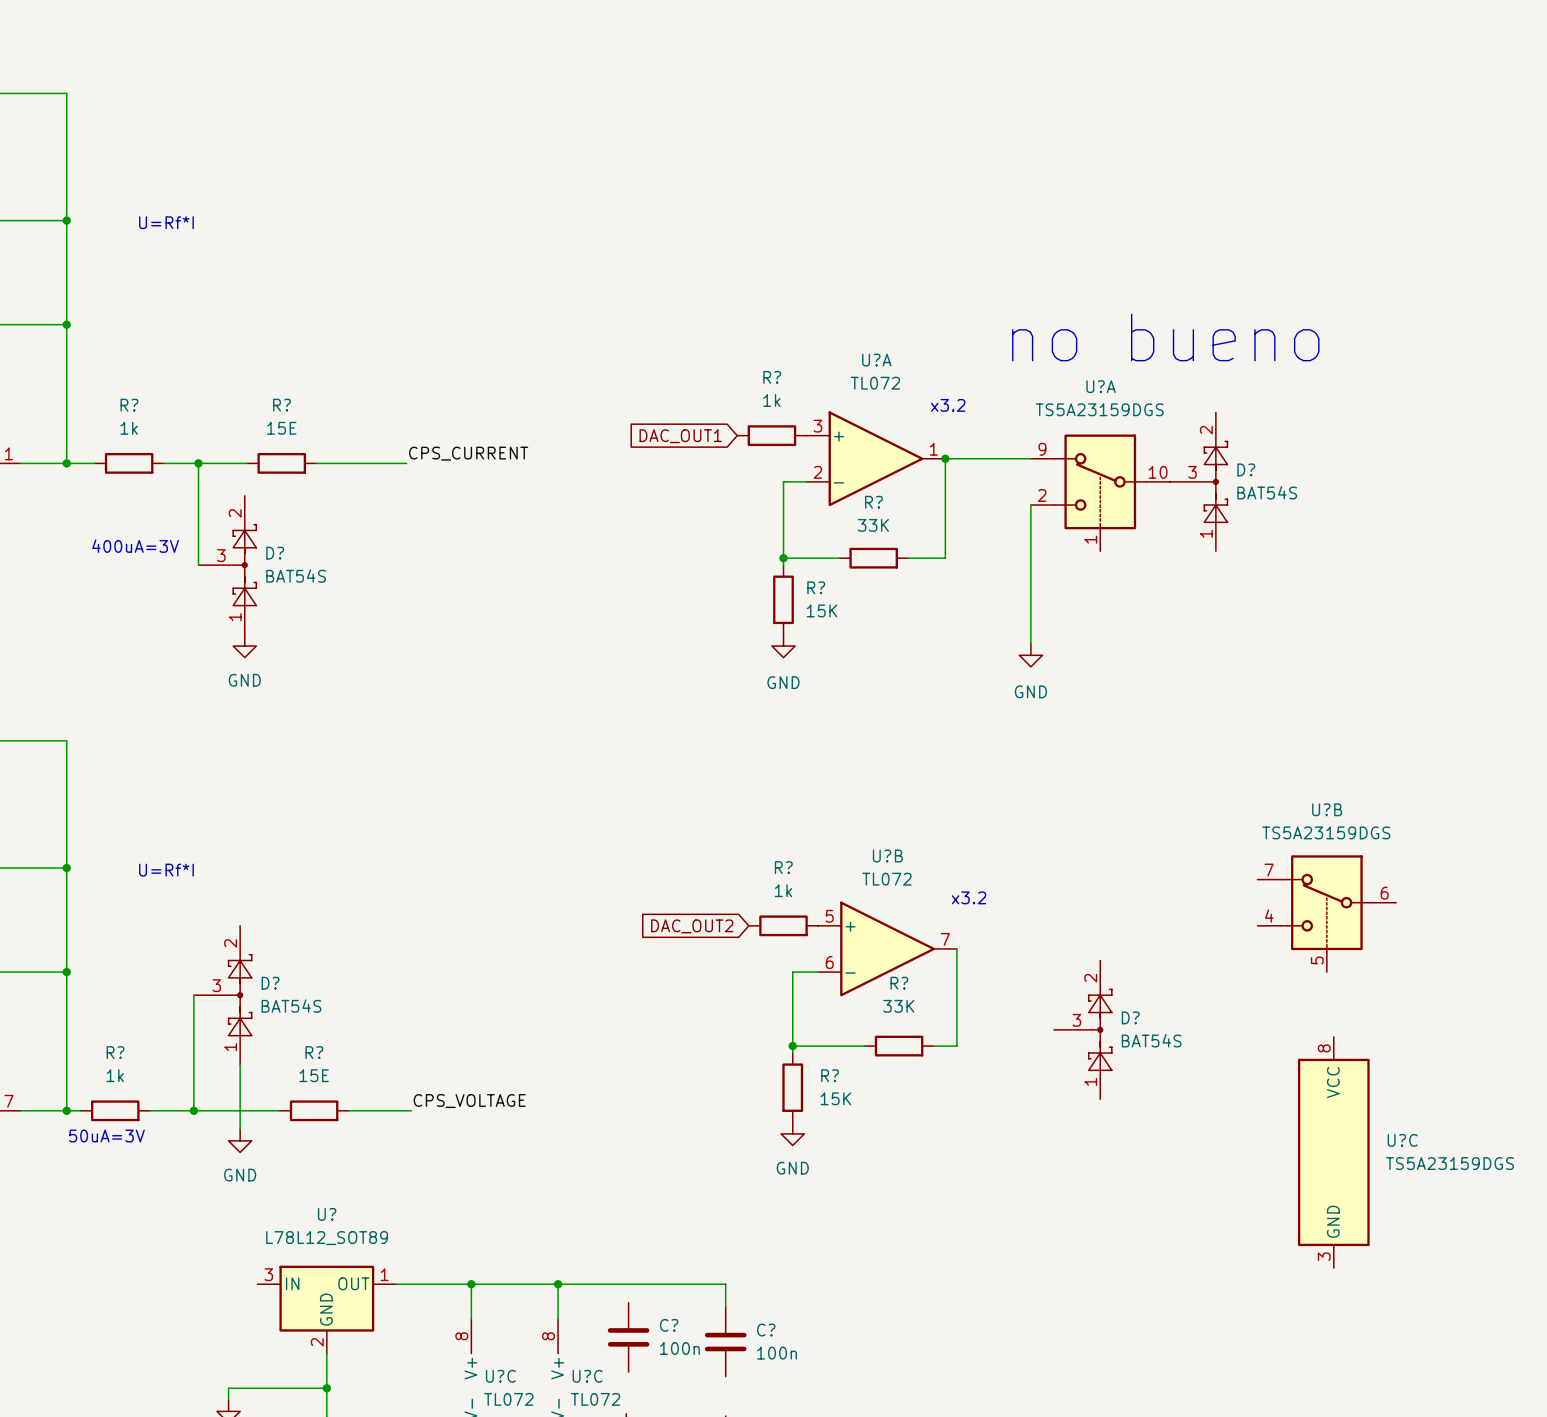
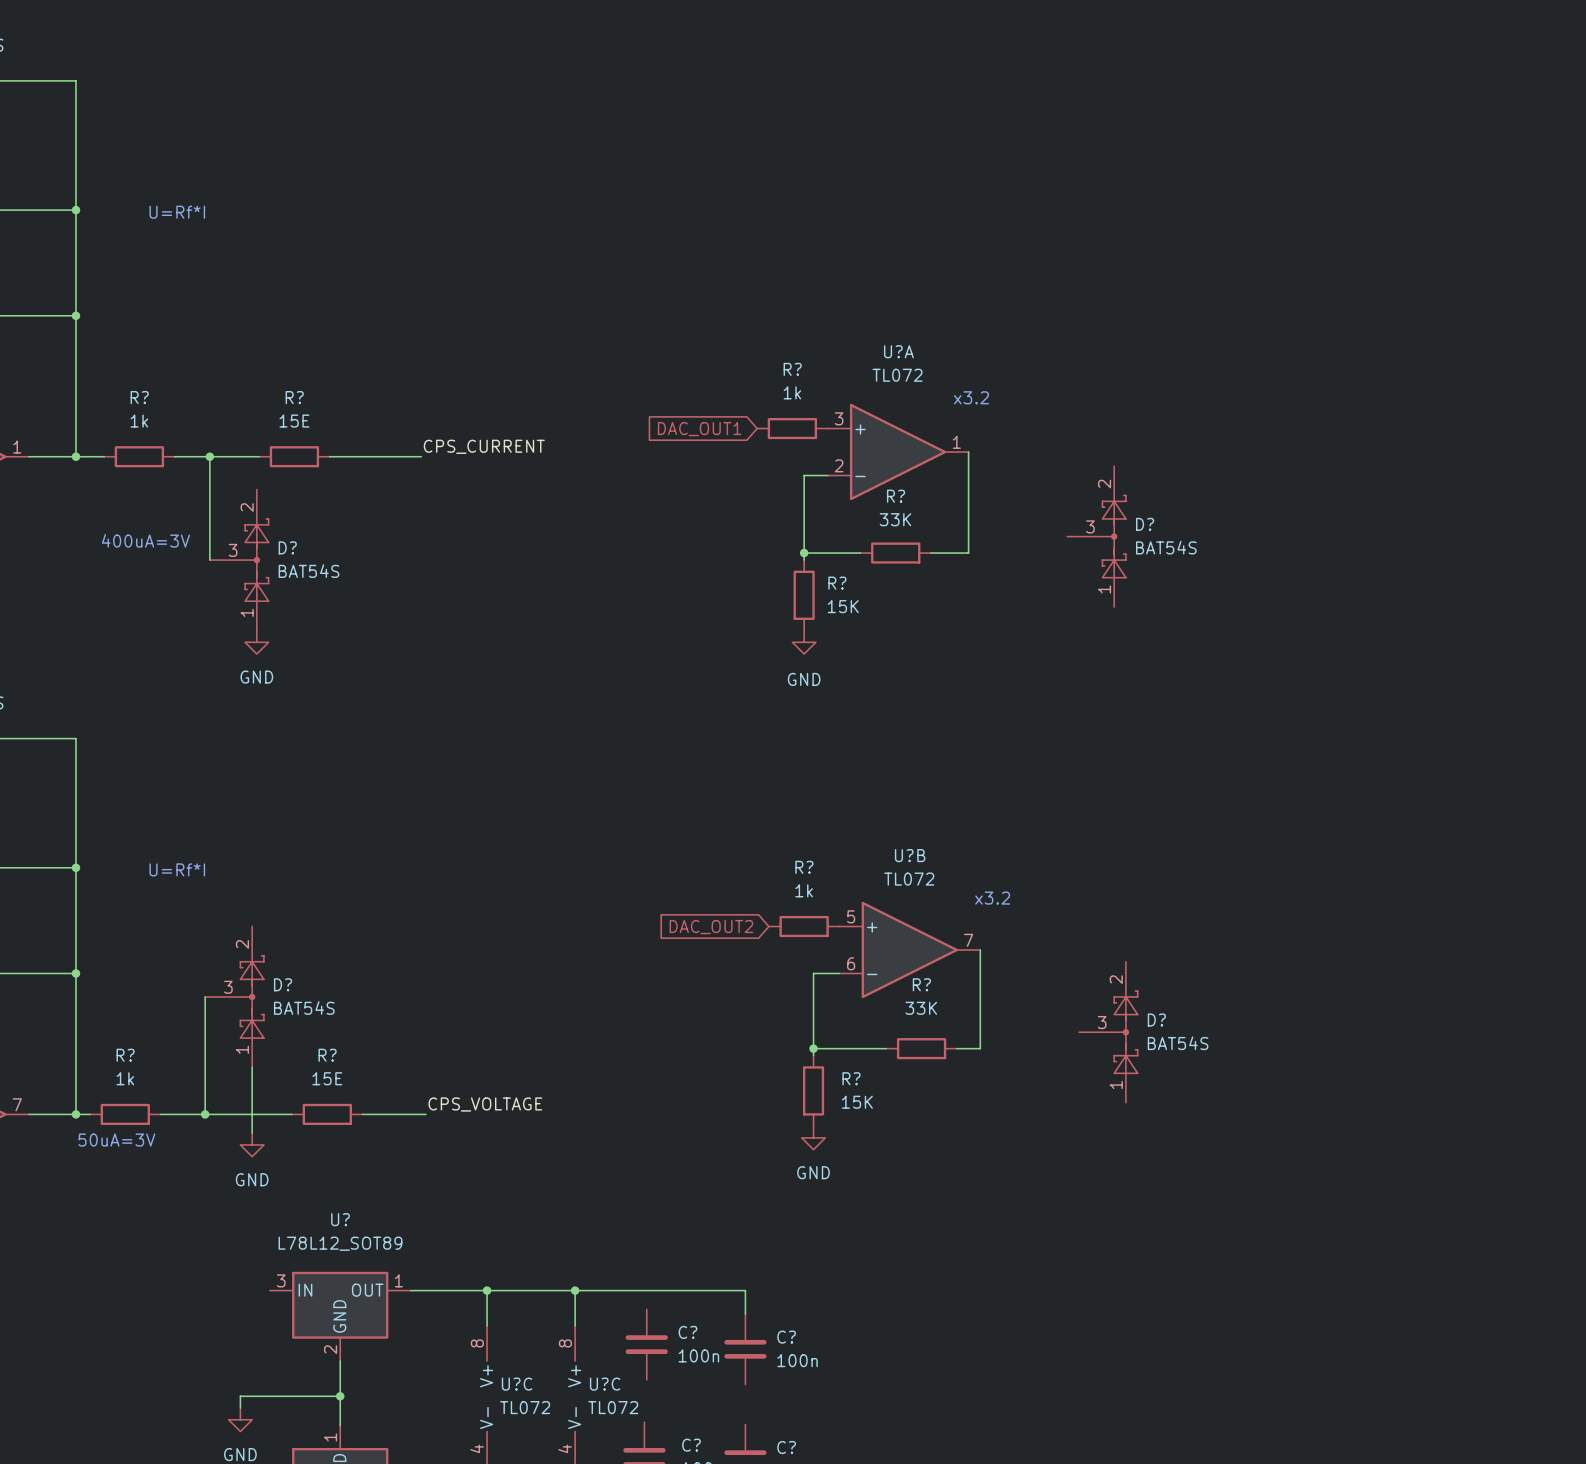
text: no bueno (1165, 337) -> none
wire: (945, 458) (1030, 458) -> none
junction: (945, 458) -> none
D? position: (1198, 481) -> (1096, 536)
U?A: TS5A23159DGS (1100, 492) -> none
wire: (1030, 505) (1030, 643) -> none
power symbol: GND (1030, 655) -> none
U?B: TS5A23159DGS (1326, 913) -> none
U?C: TS5A23159DGS (1333, 1152) -> none

